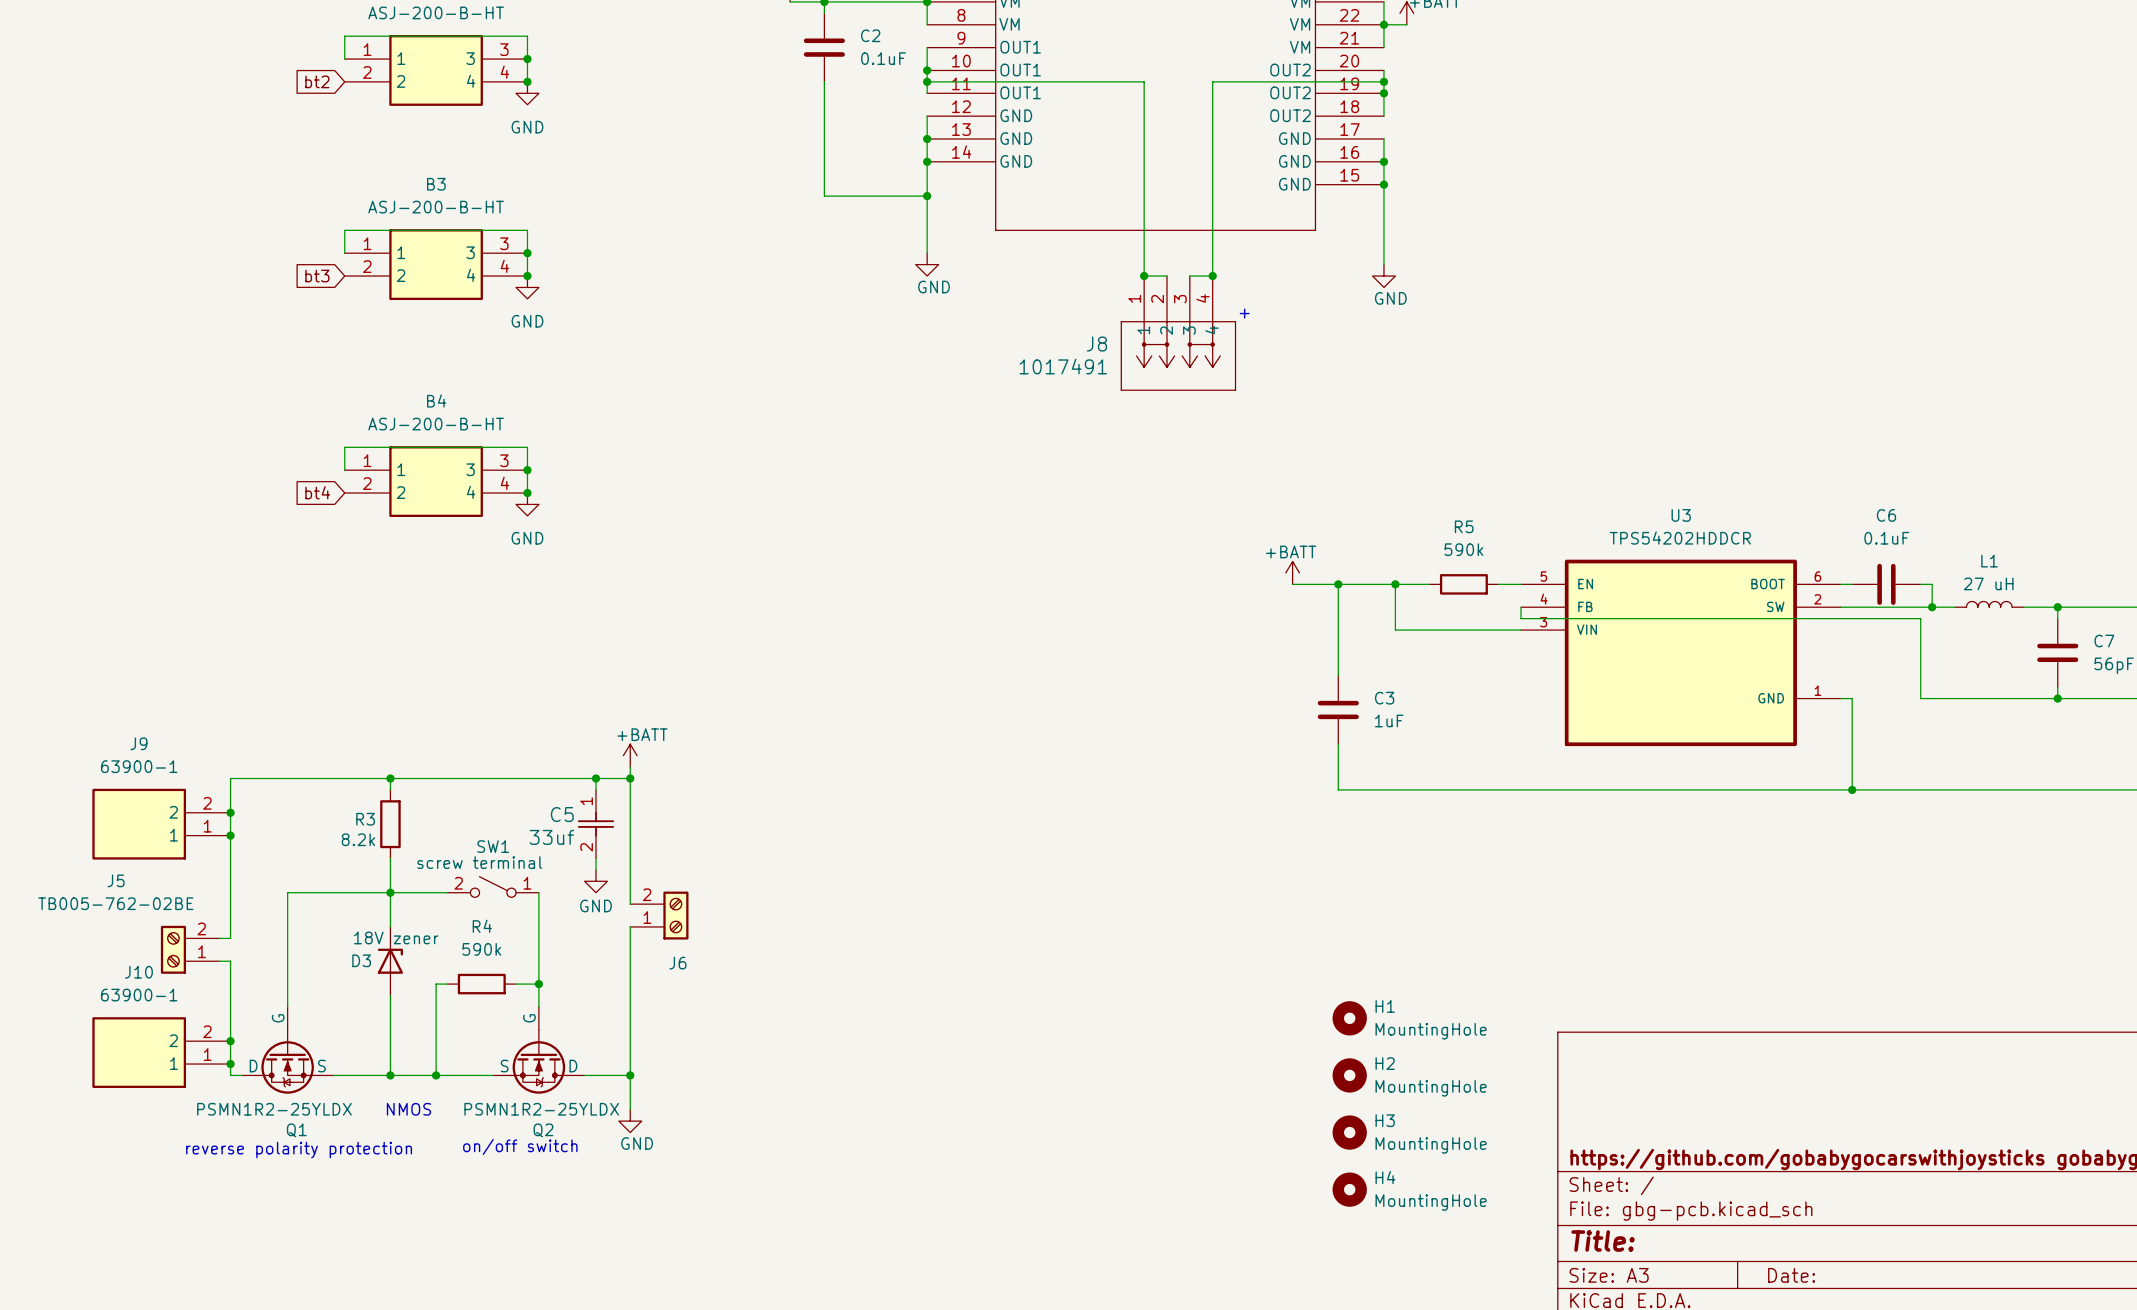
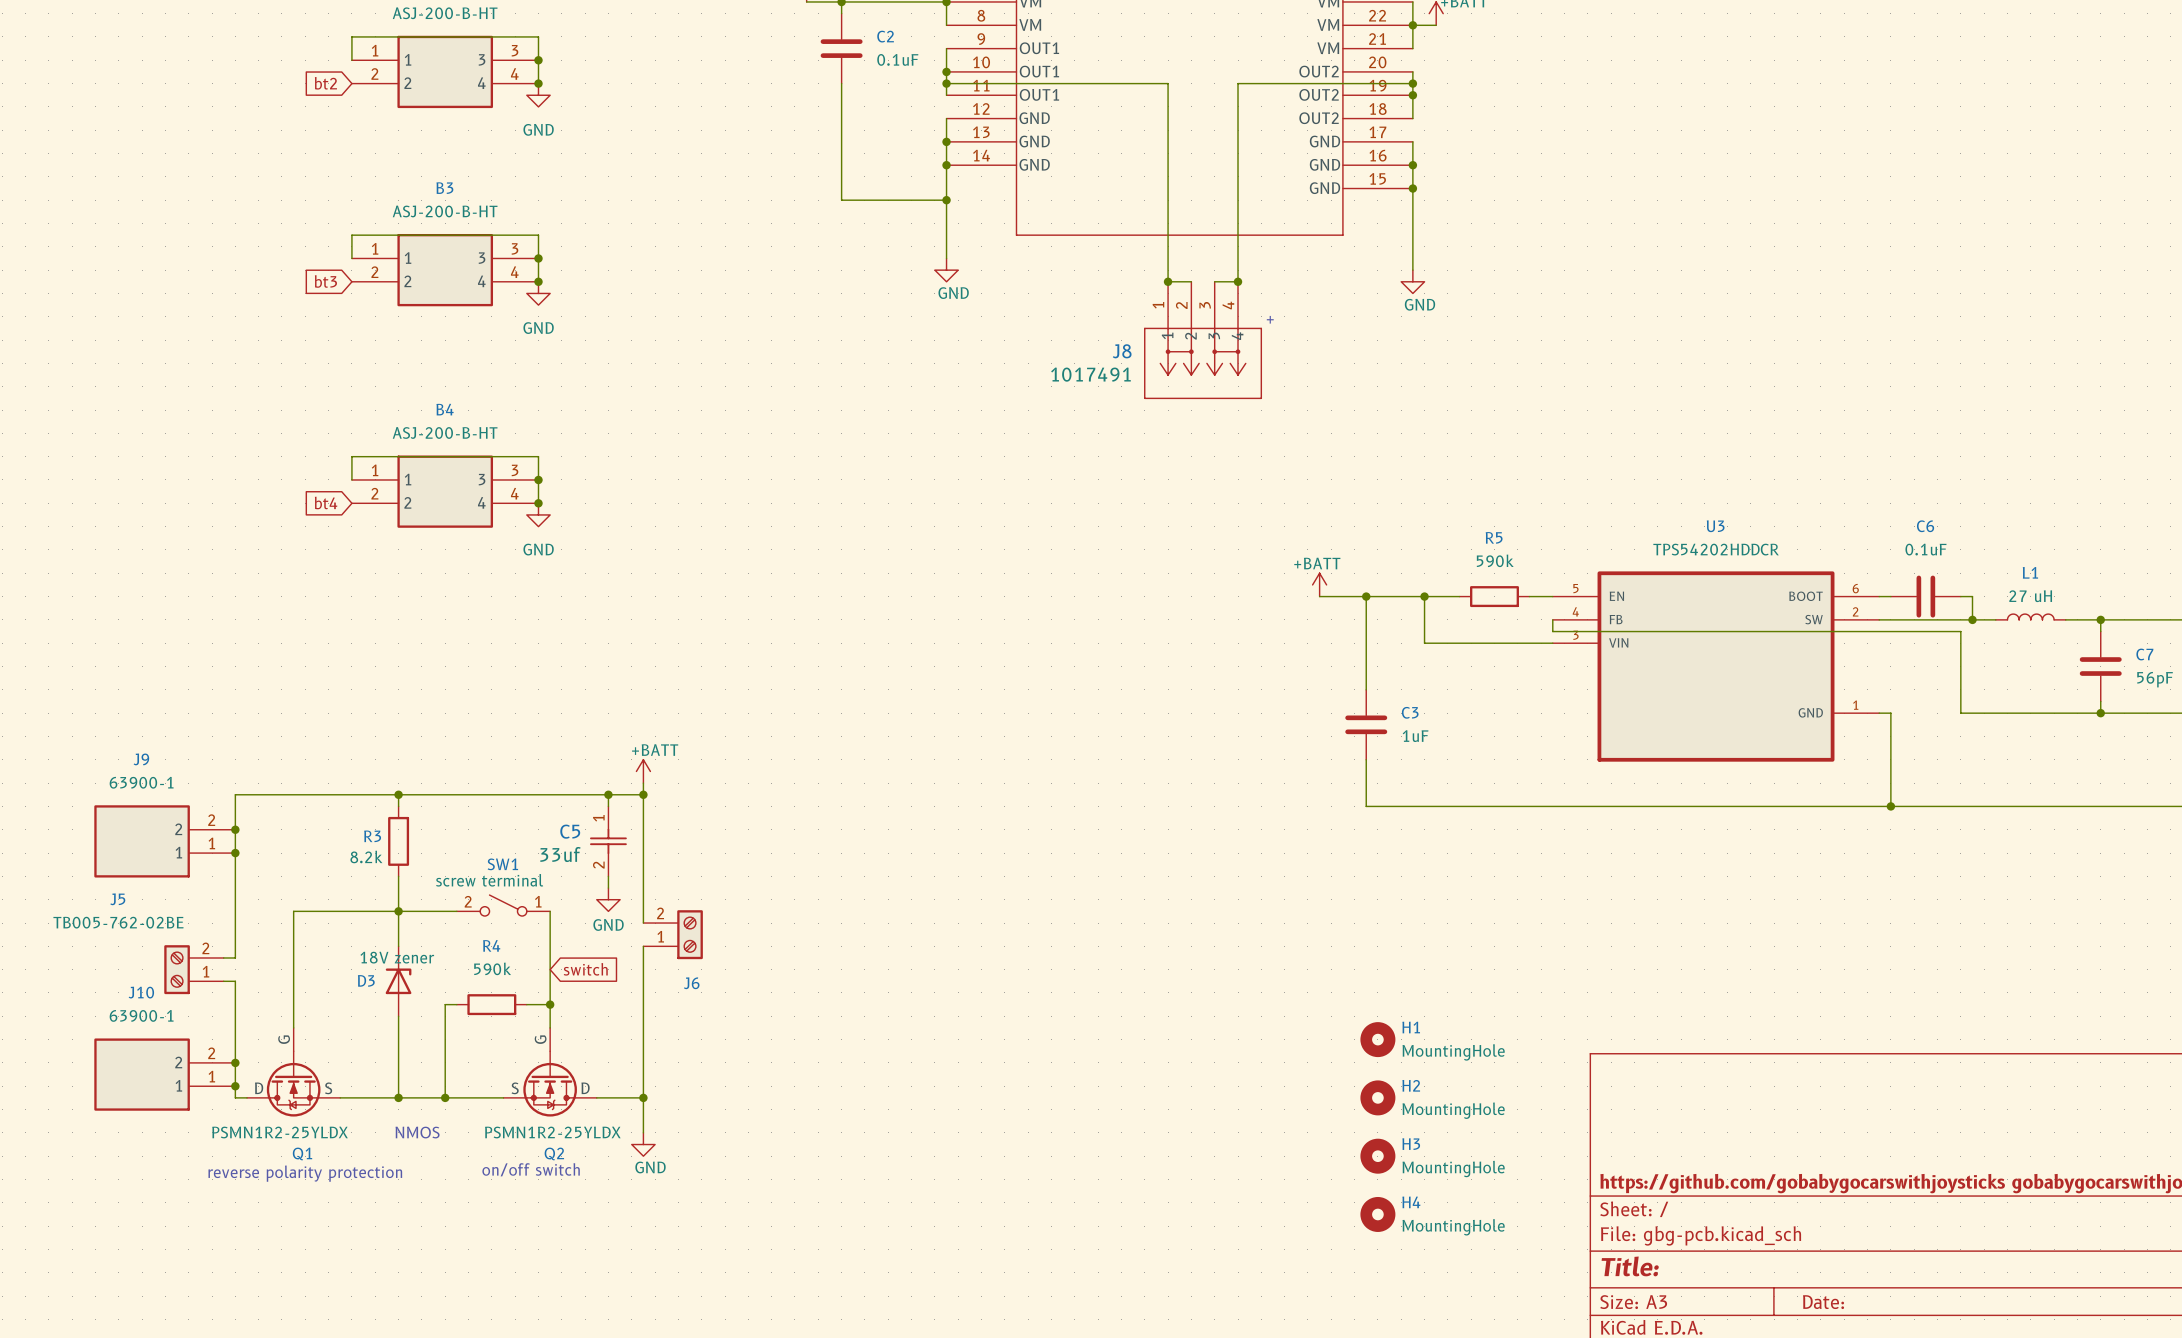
global label: none -> switch (585, 969)

